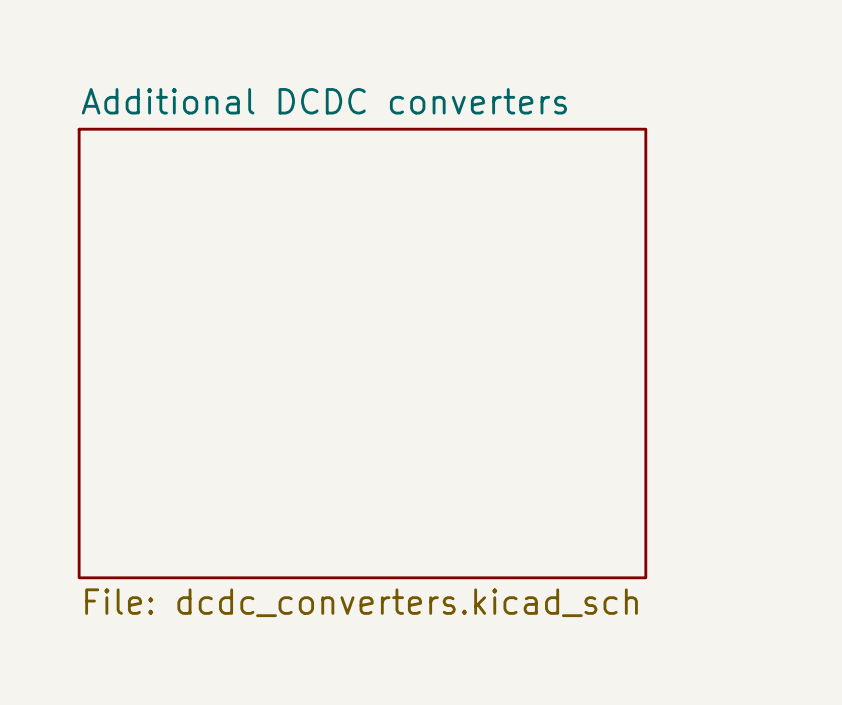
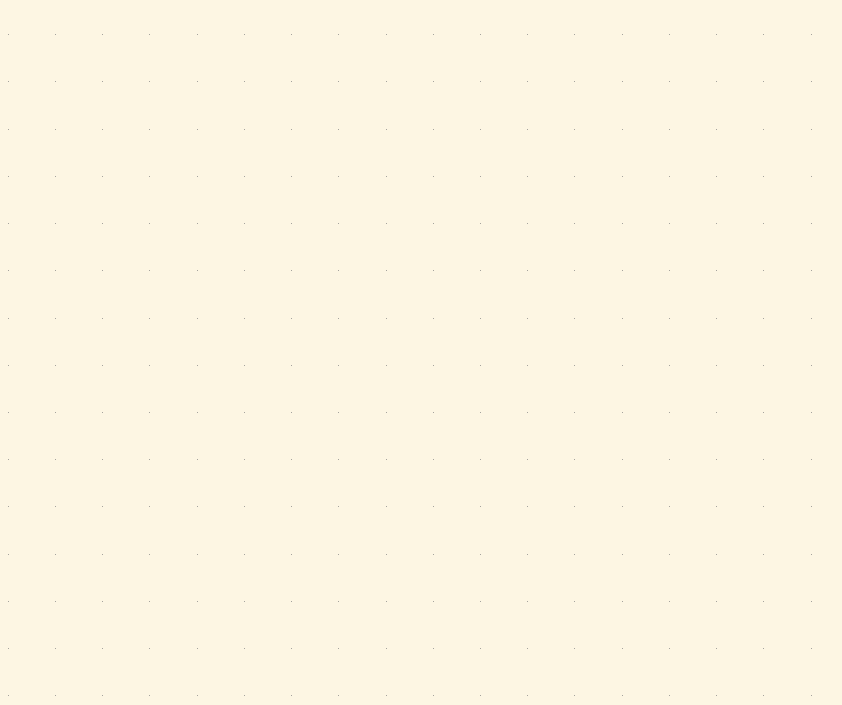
sheet Additional DCDC converters: File: dcdc_converters.kicad_sch (362, 353) -> none

